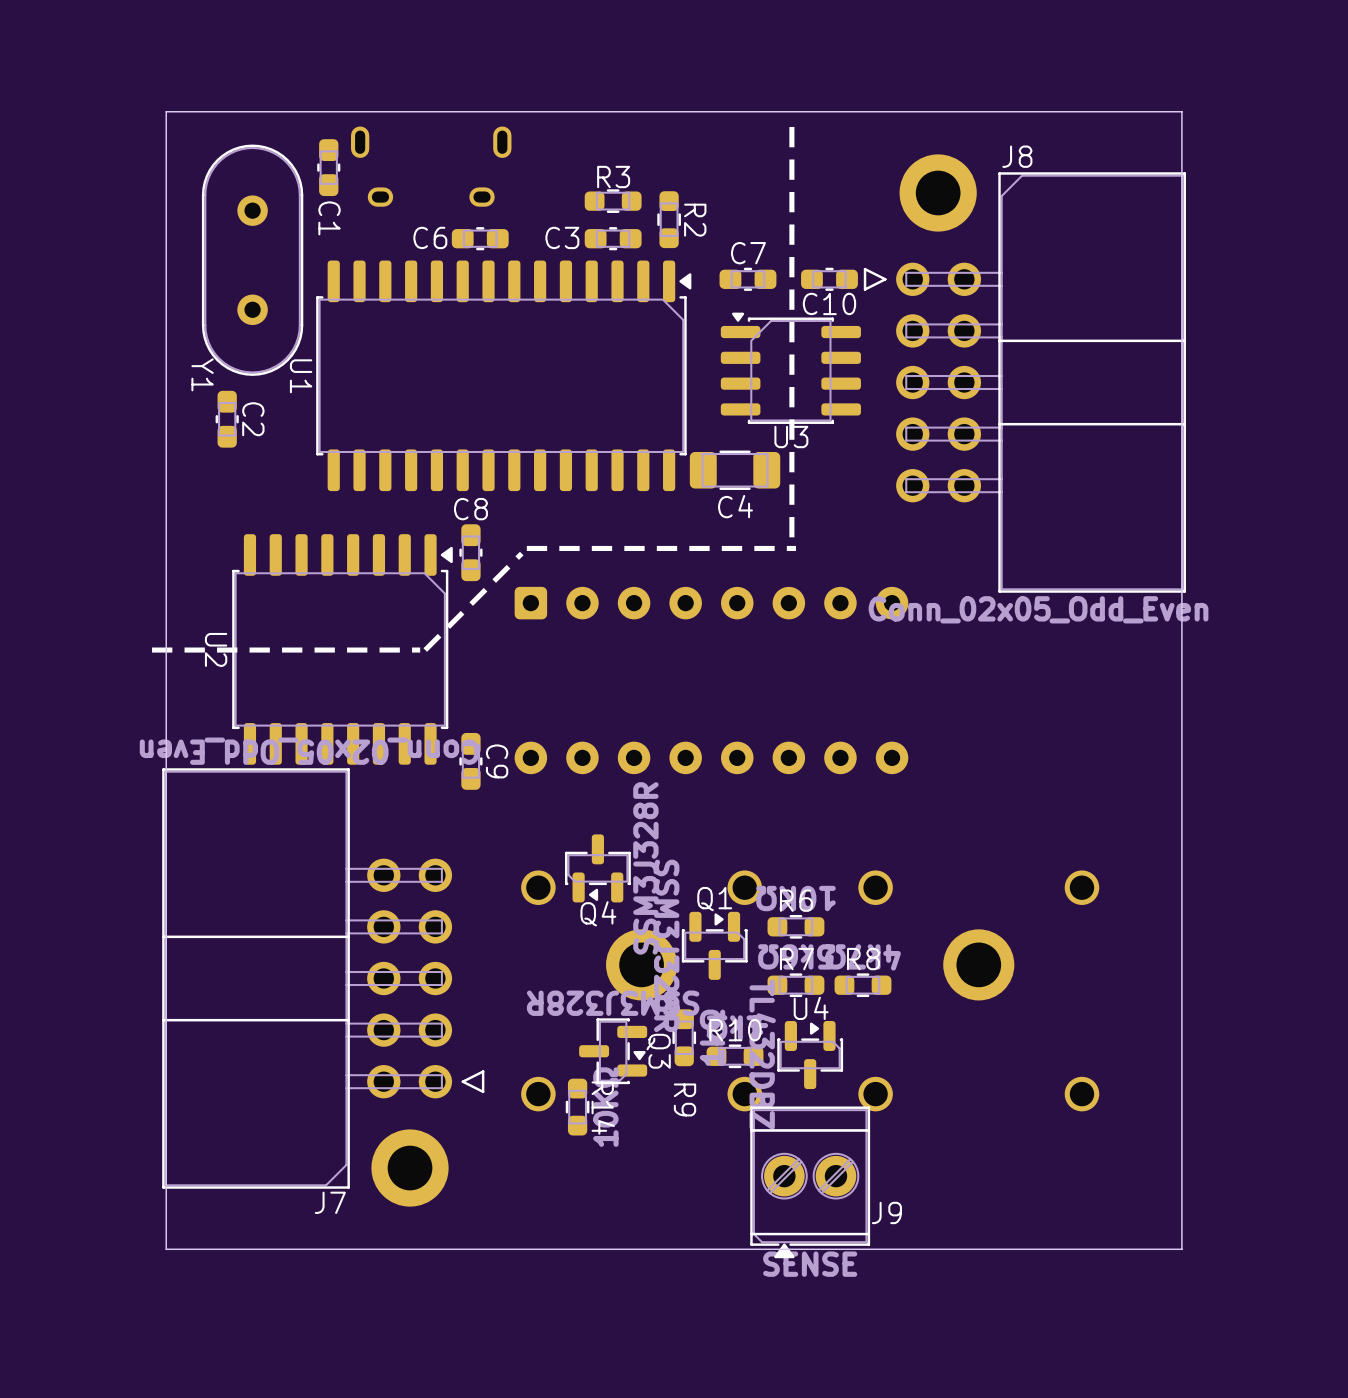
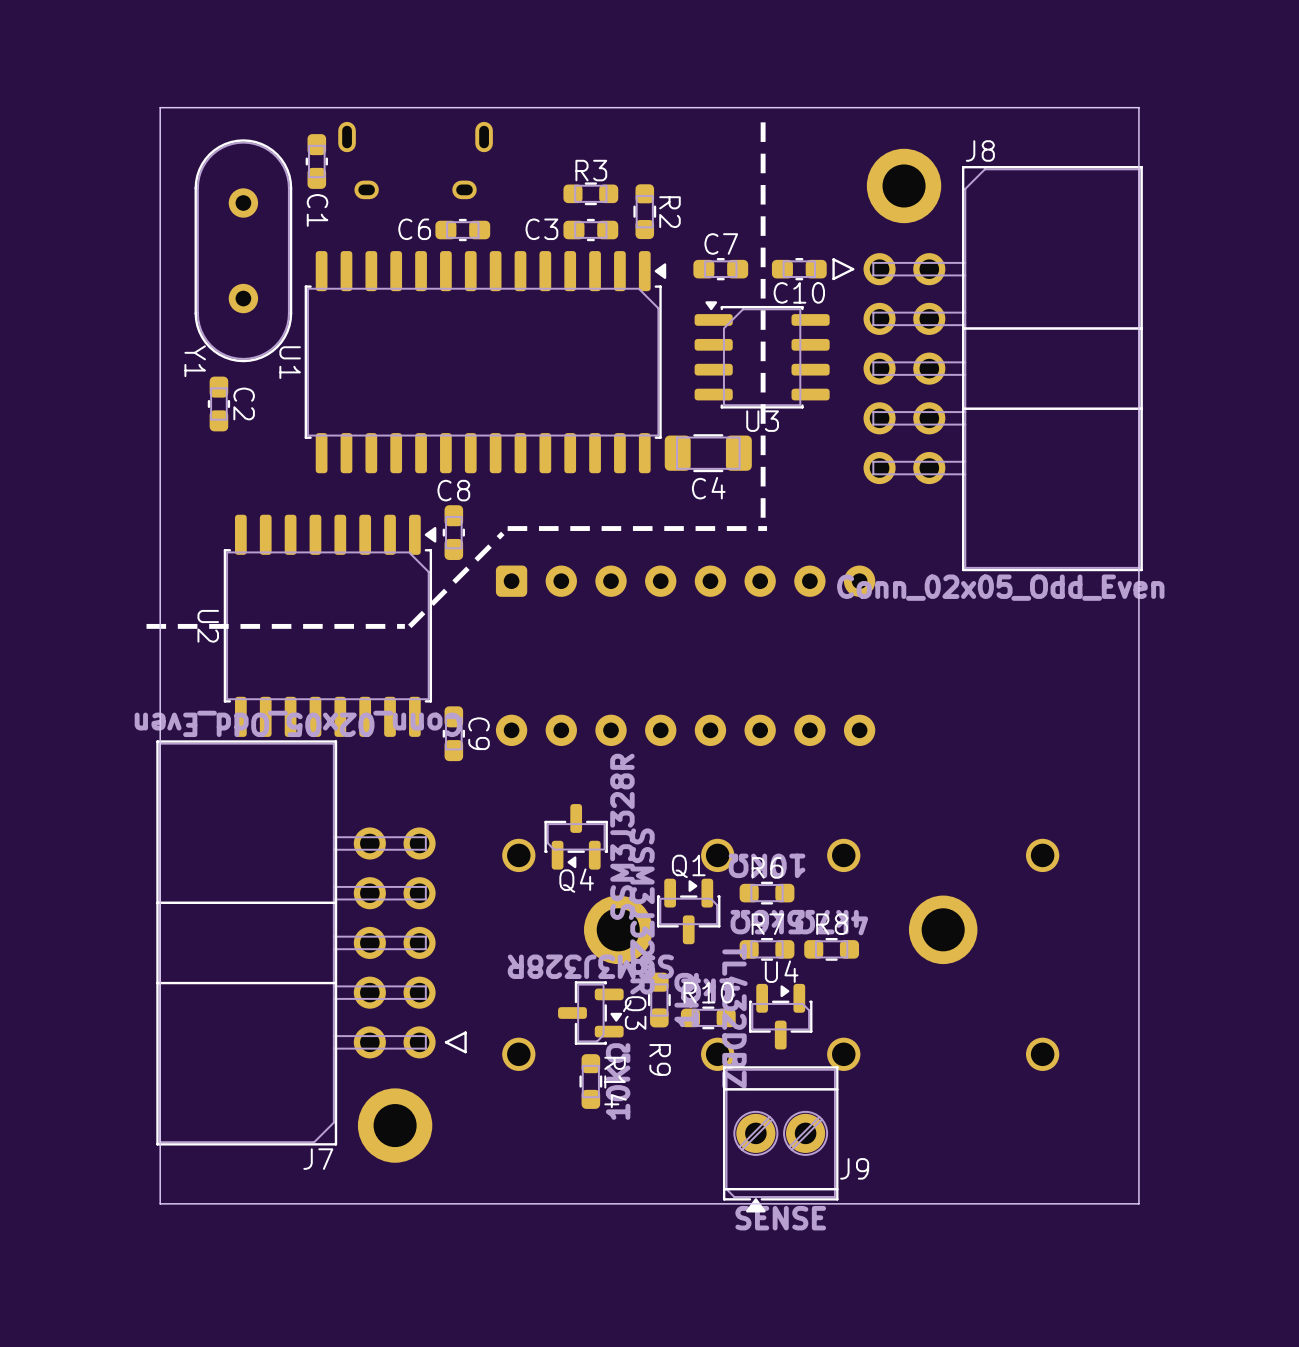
R14 position: (577, 1107) -> (590, 1081)

